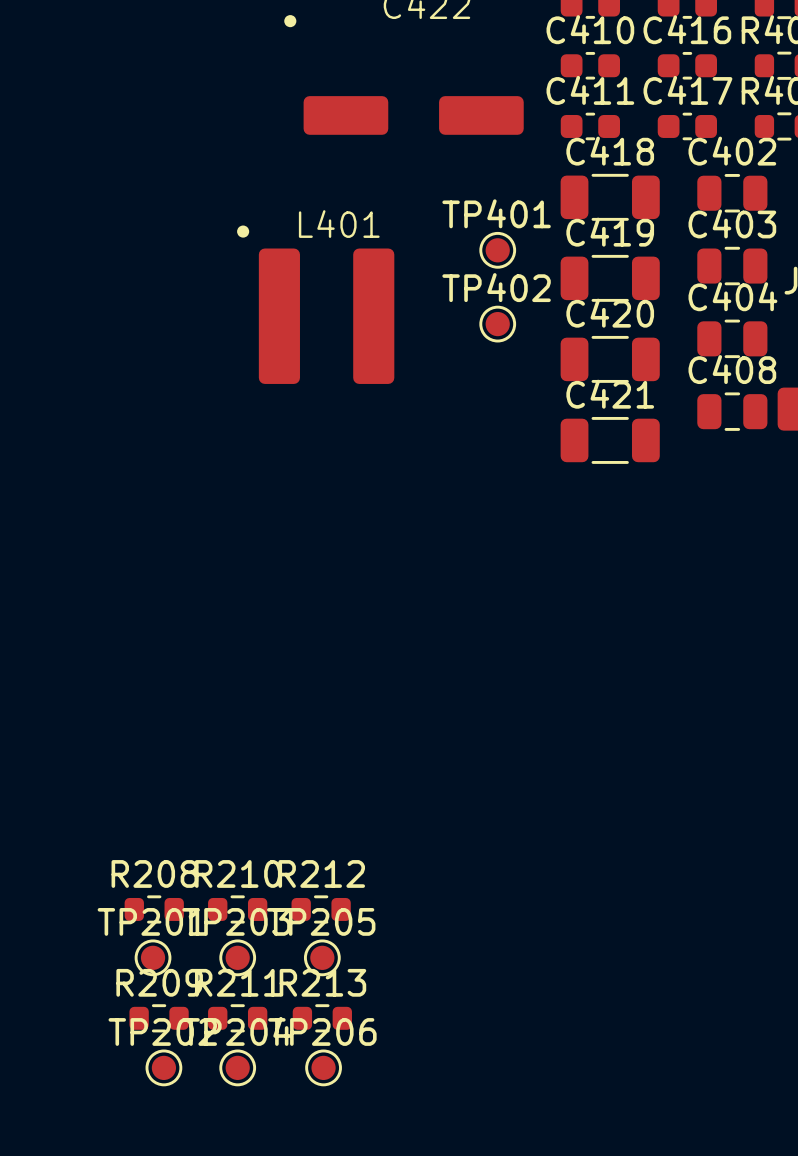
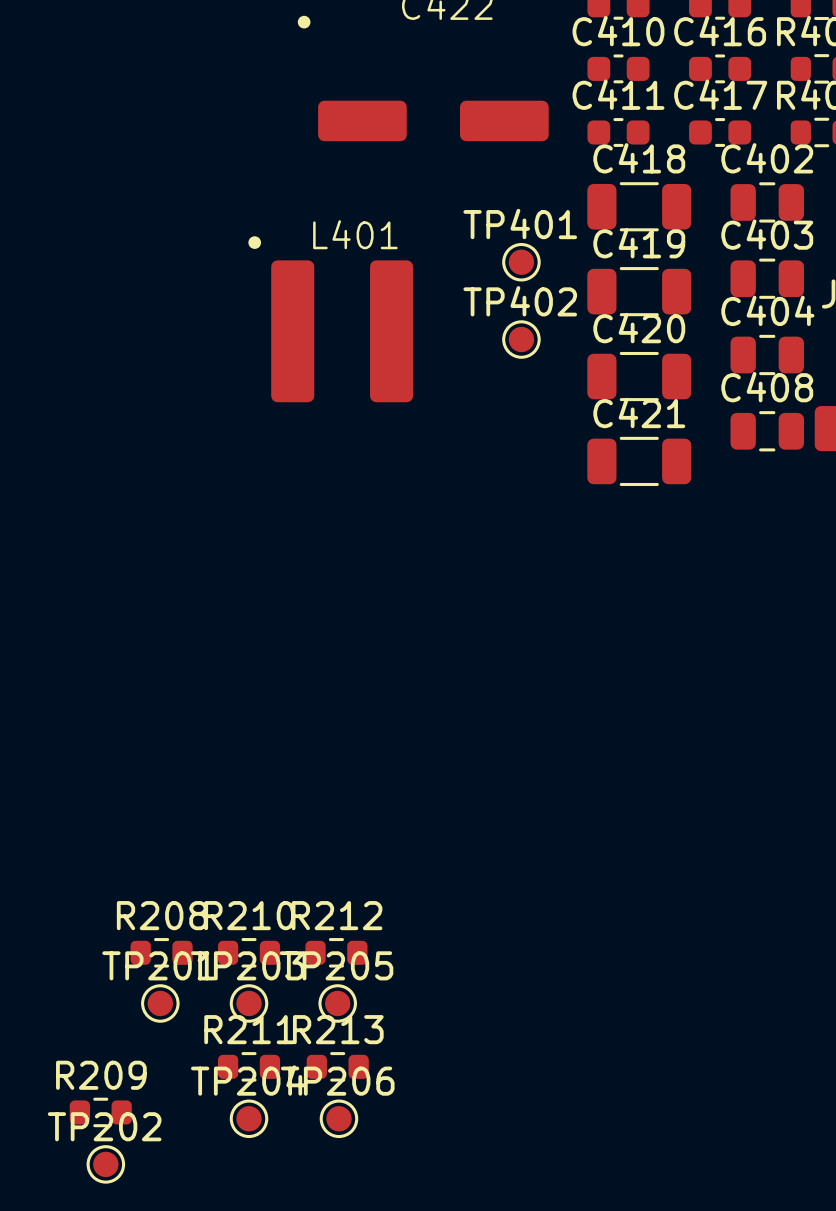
R209 position: (159, 1018) -> (100, 1112)
TP202 position: (163, 1067) -> (105, 1164)

